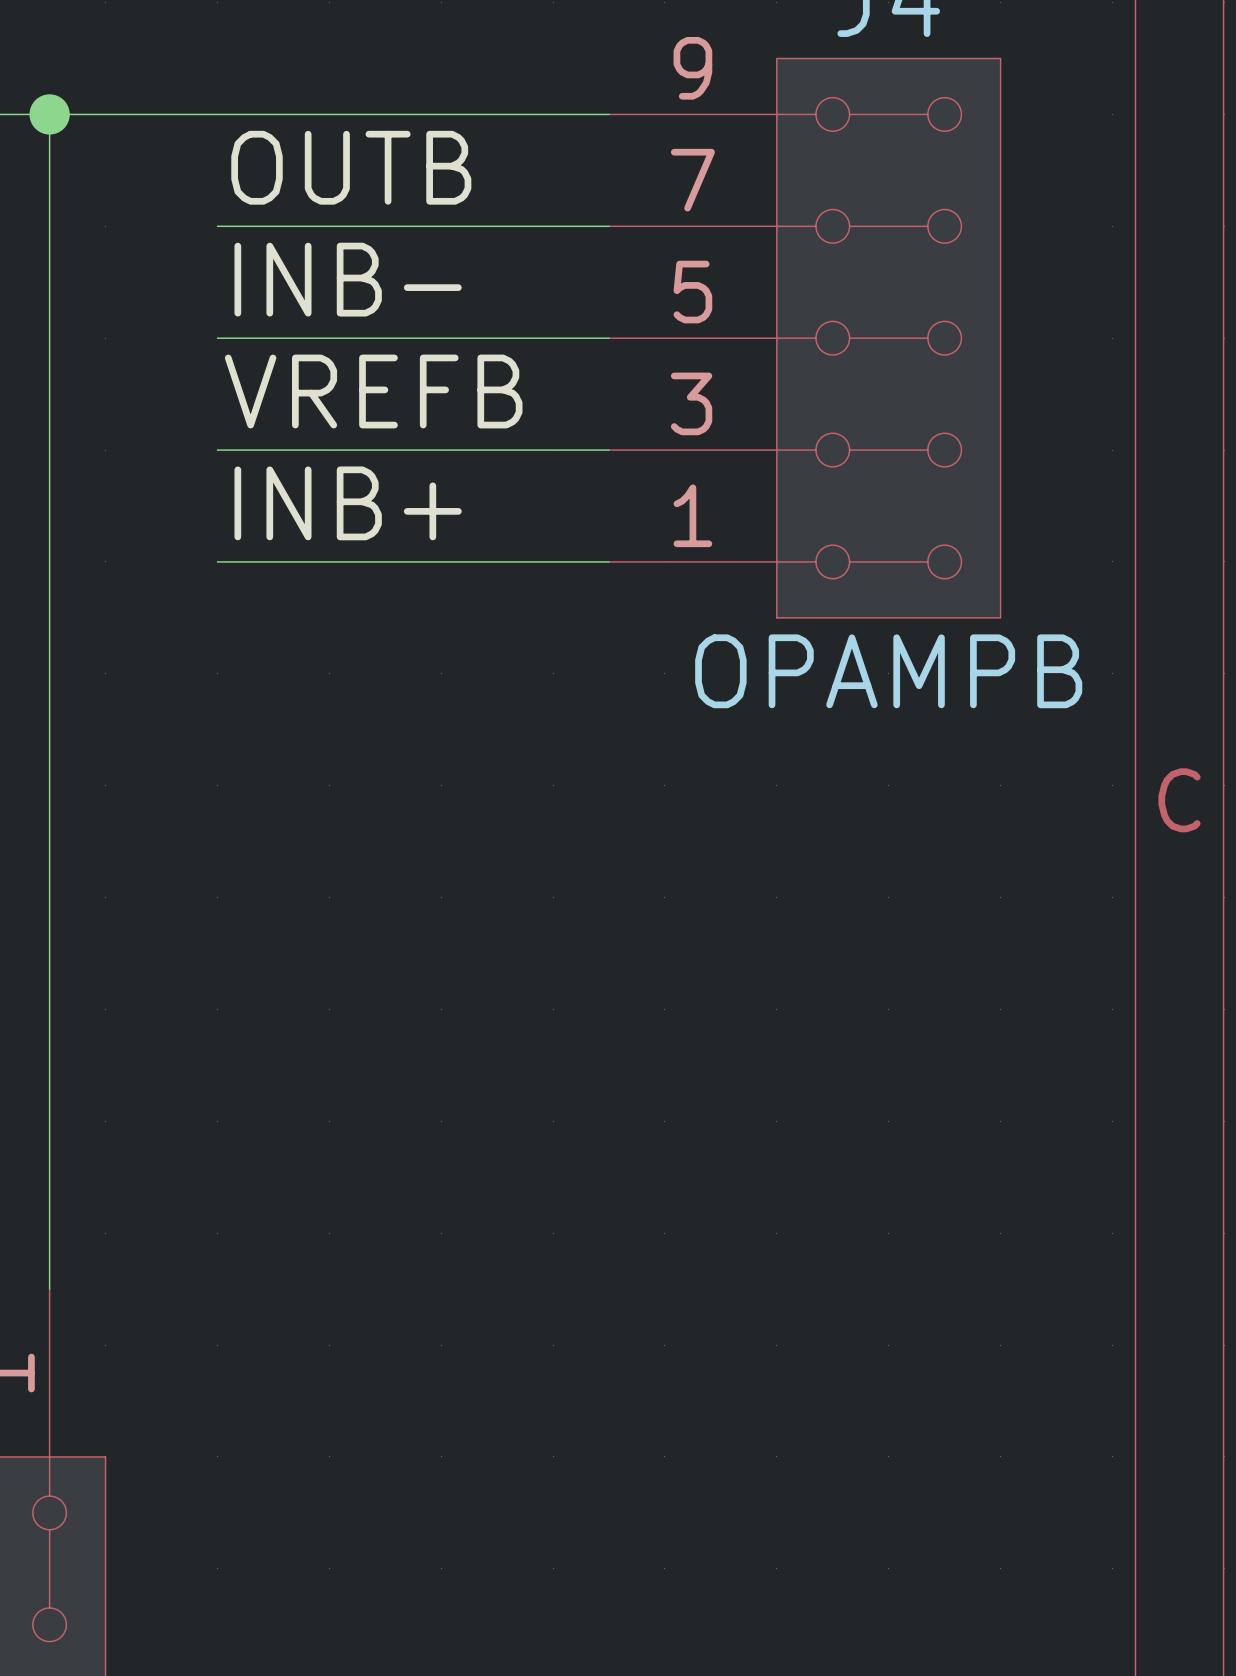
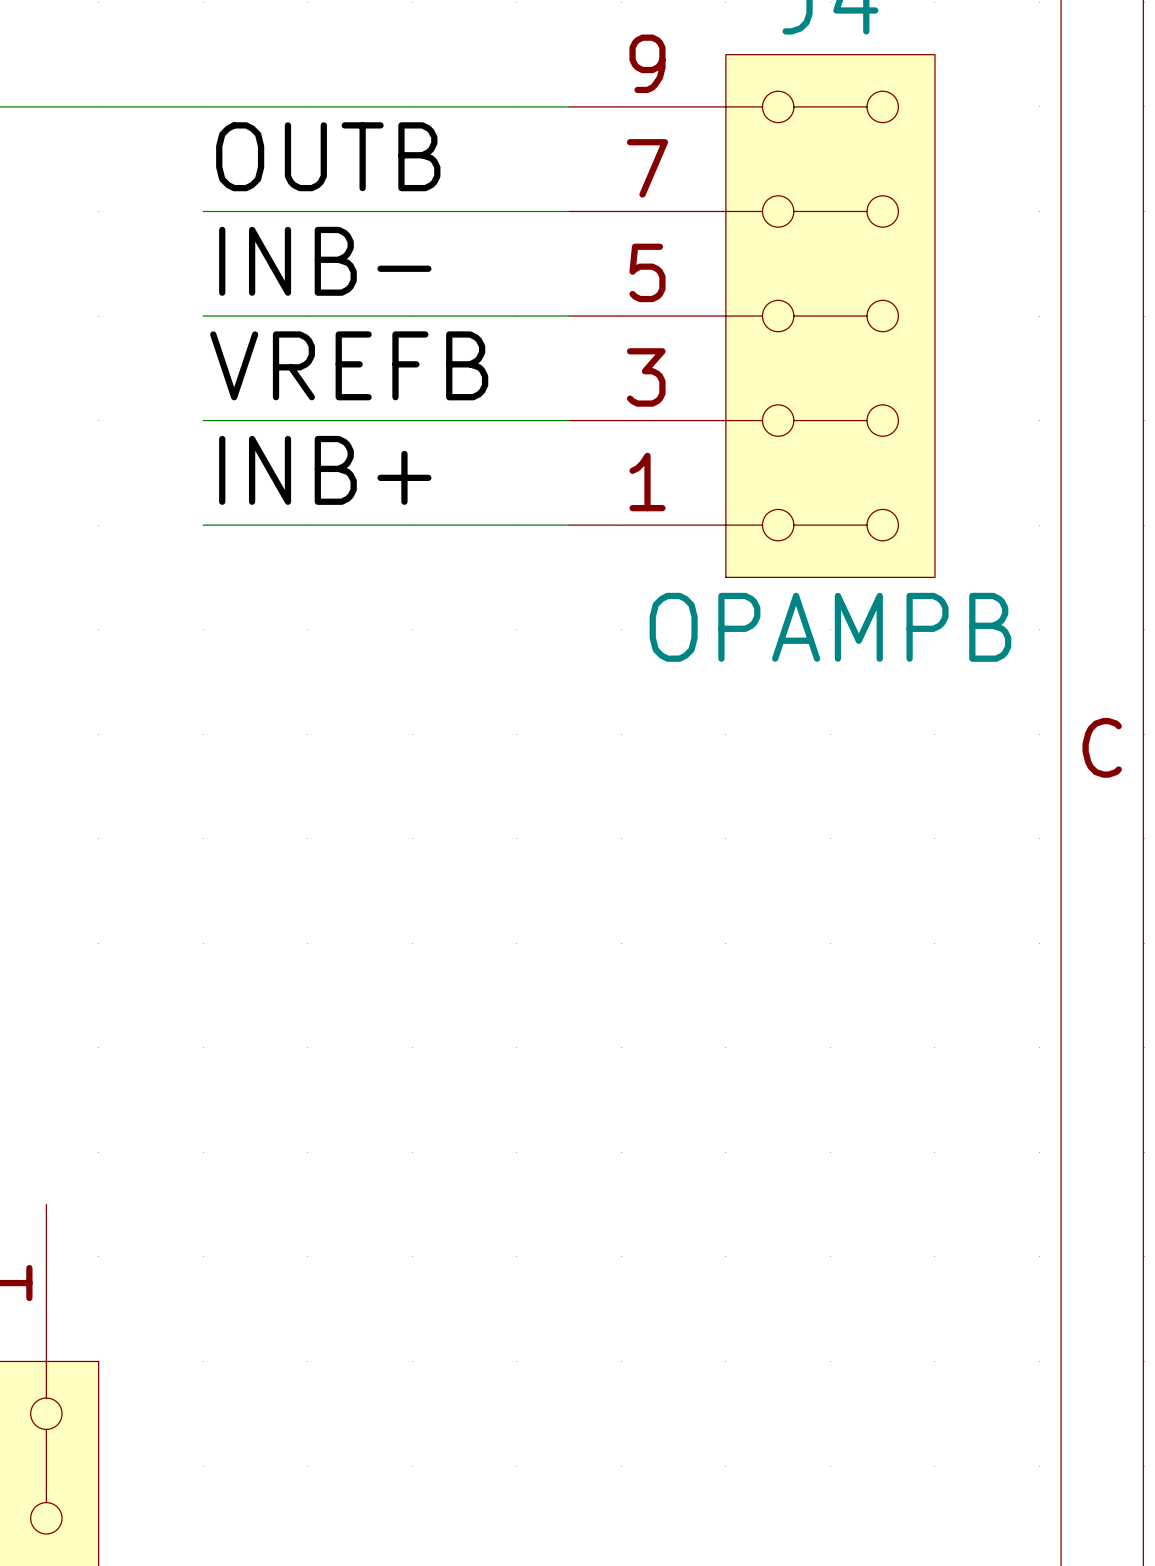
wire: (49, 114) (49, 1289) -> none
junction: (49, 114) -> none

